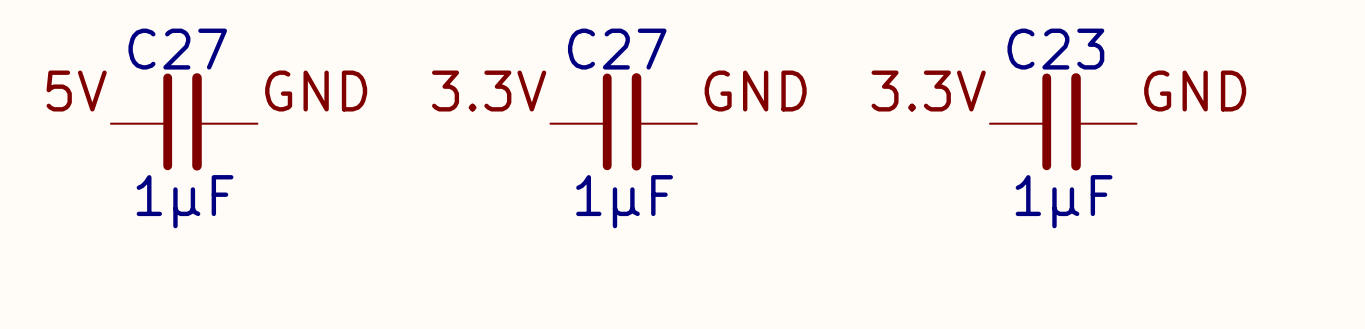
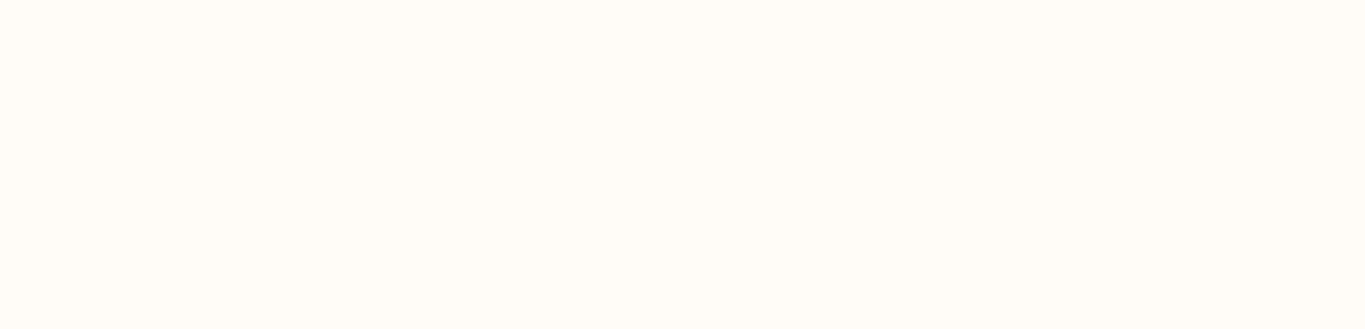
label: 5V (76, 91) -> none
label: GND (316, 91) -> none
label: 3.3V (489, 91) -> none
label: GND (755, 91) -> none
label: 3.3V (928, 91) -> none
label: GND (1195, 91) -> none
C27: 1μF (184, 121) -> none
C27: 1μF (623, 121) -> none
C23: 1μF (1063, 121) -> none

